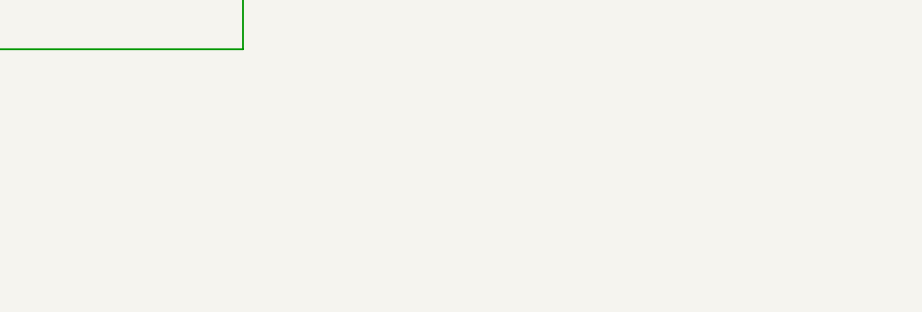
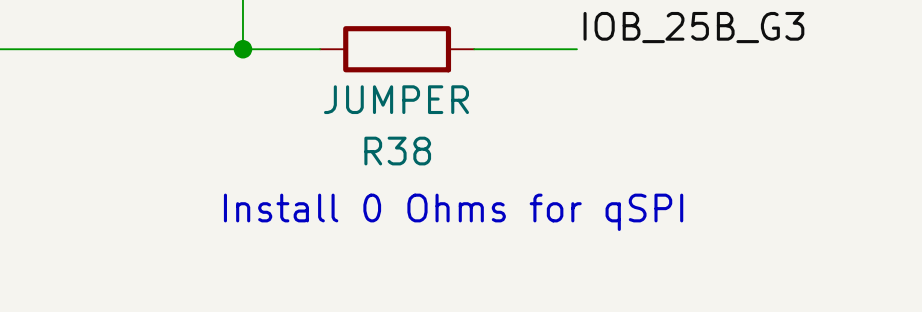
label: none -> IOB_25B_G3 (693, 27)
wire: none -> (242, 49) (320, 49)
junction: none -> (242, 49)
R38: none -> JUMPER (397, 49)
wire: none -> (474, 49) (576, 49)
text: none -> Install 0 Ohms for qSPI (453, 212)

